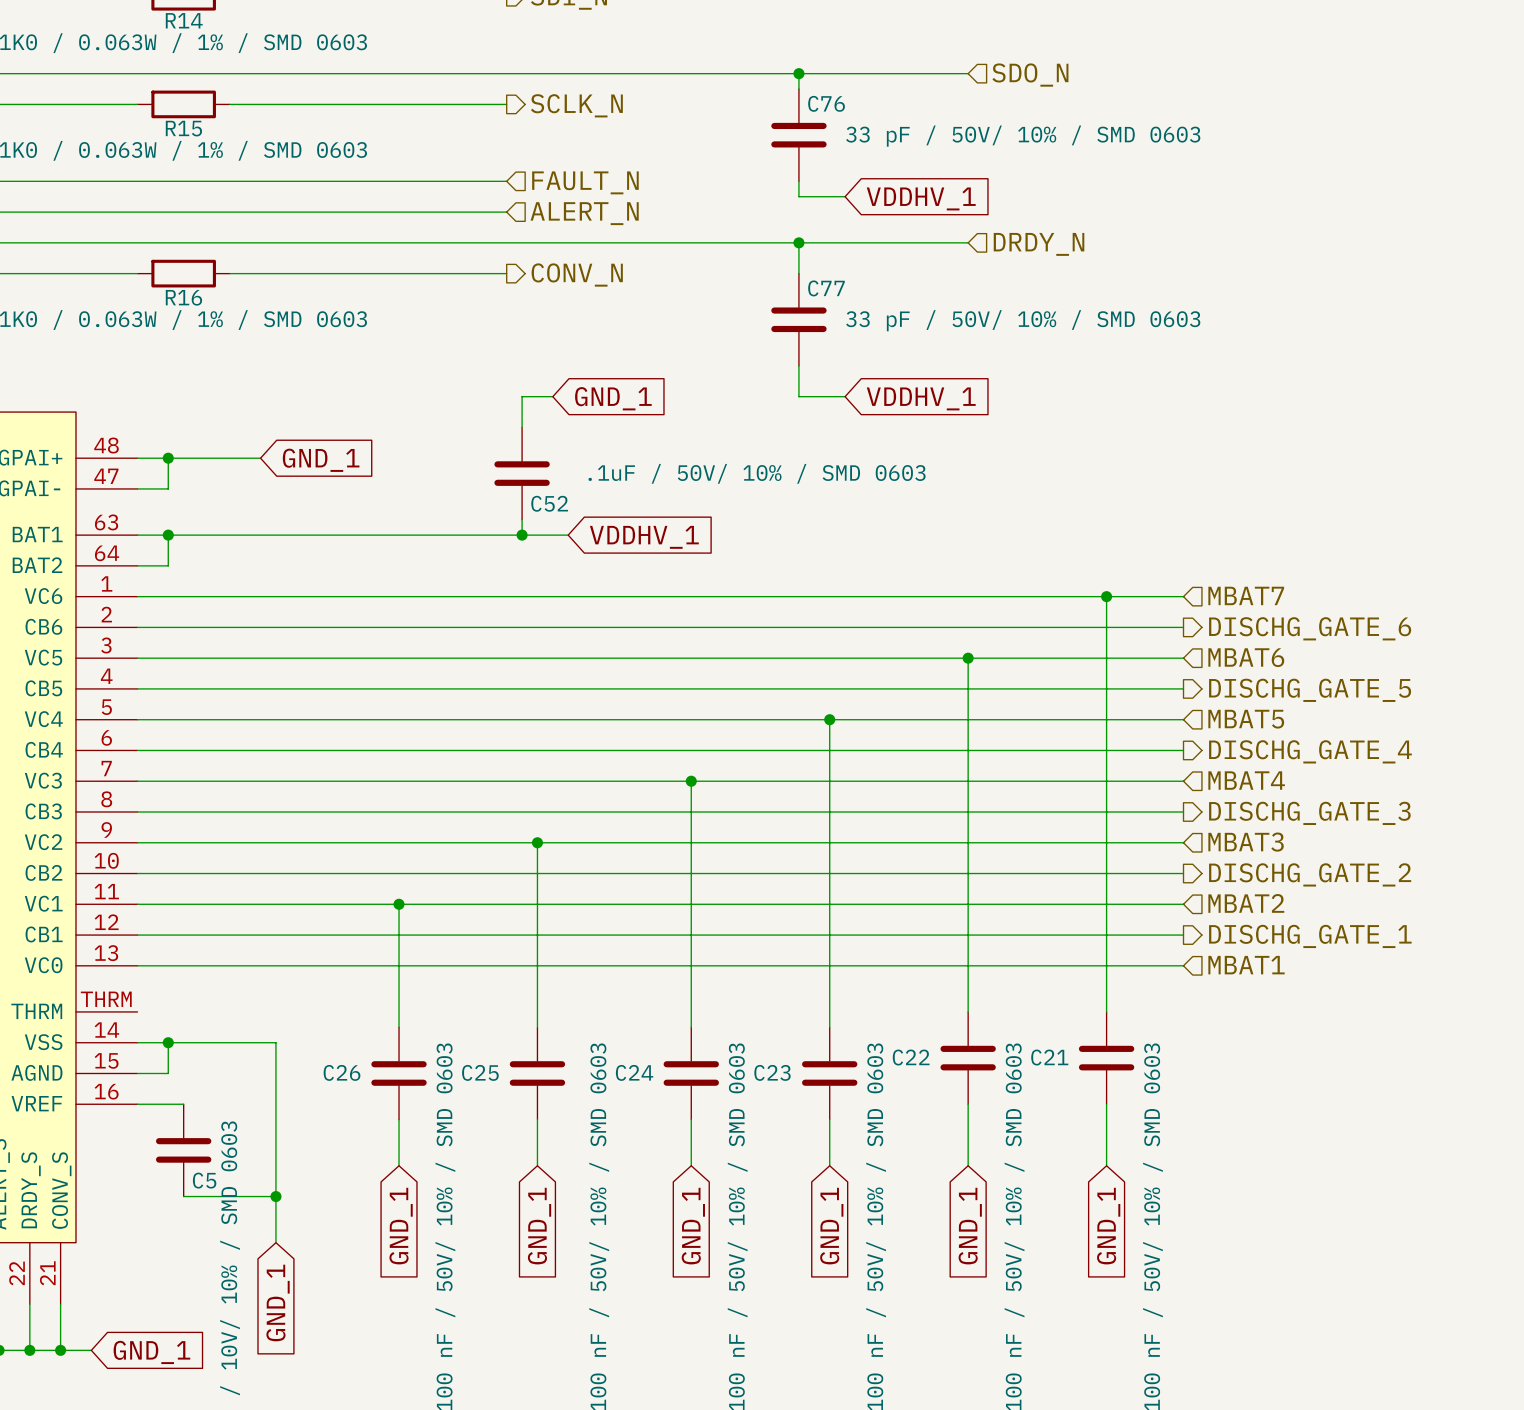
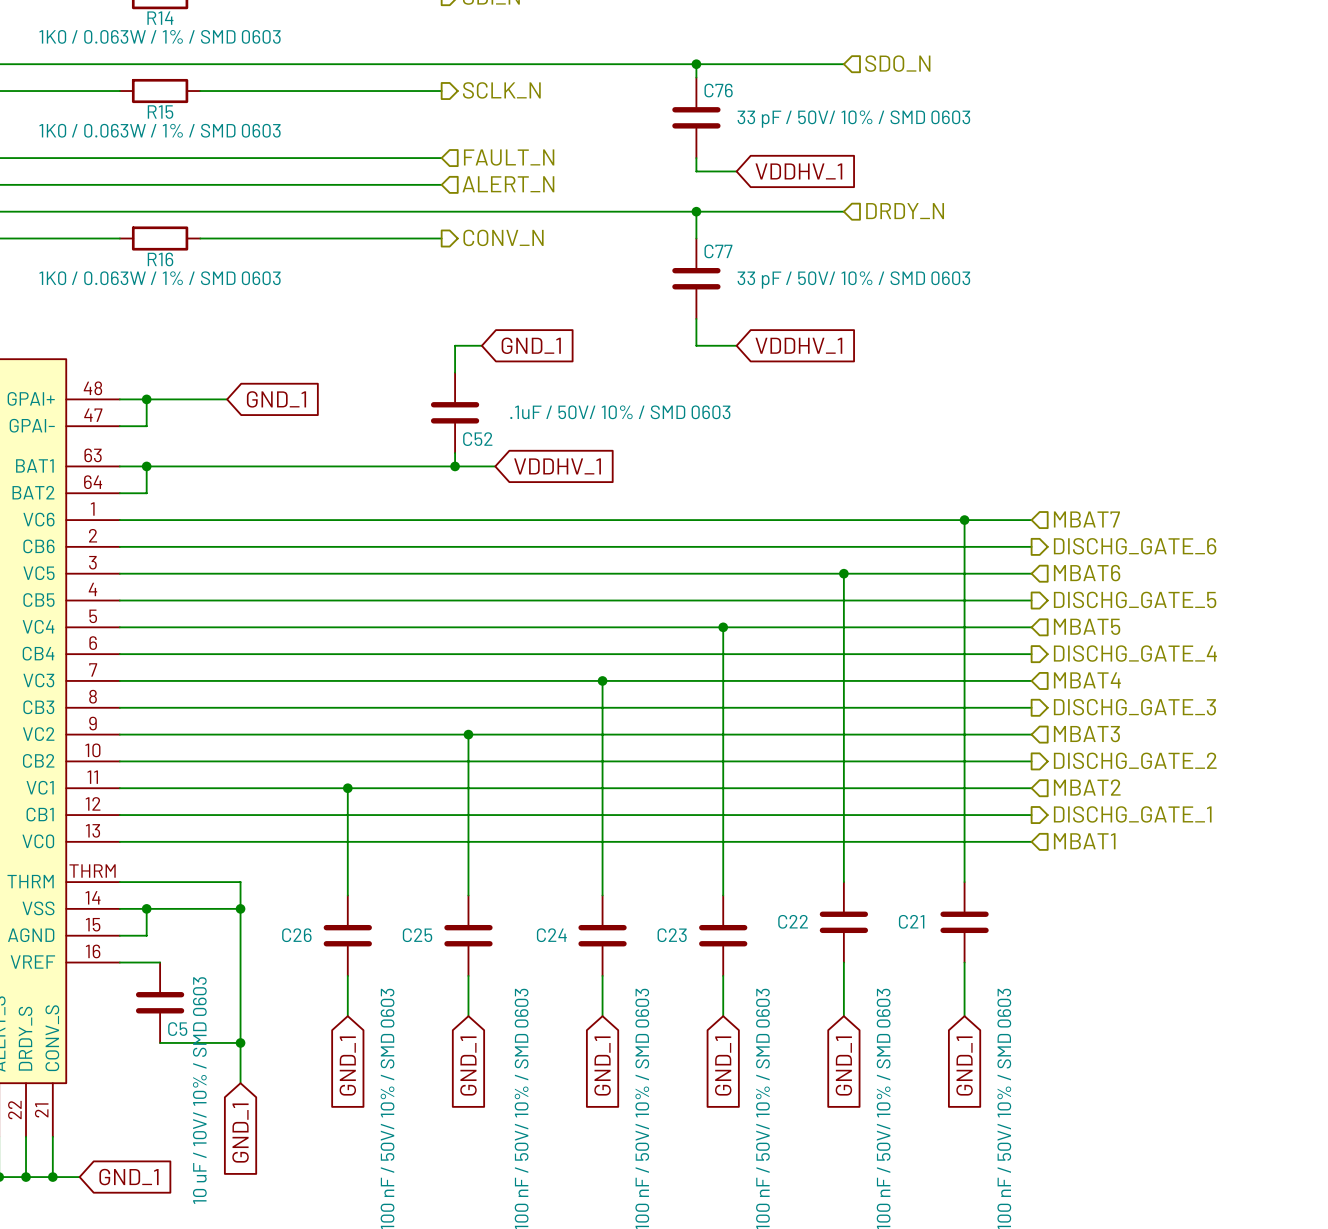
wire: none -> (119, 882) (240, 882) (240, 908)
junction: none -> (240, 908)

